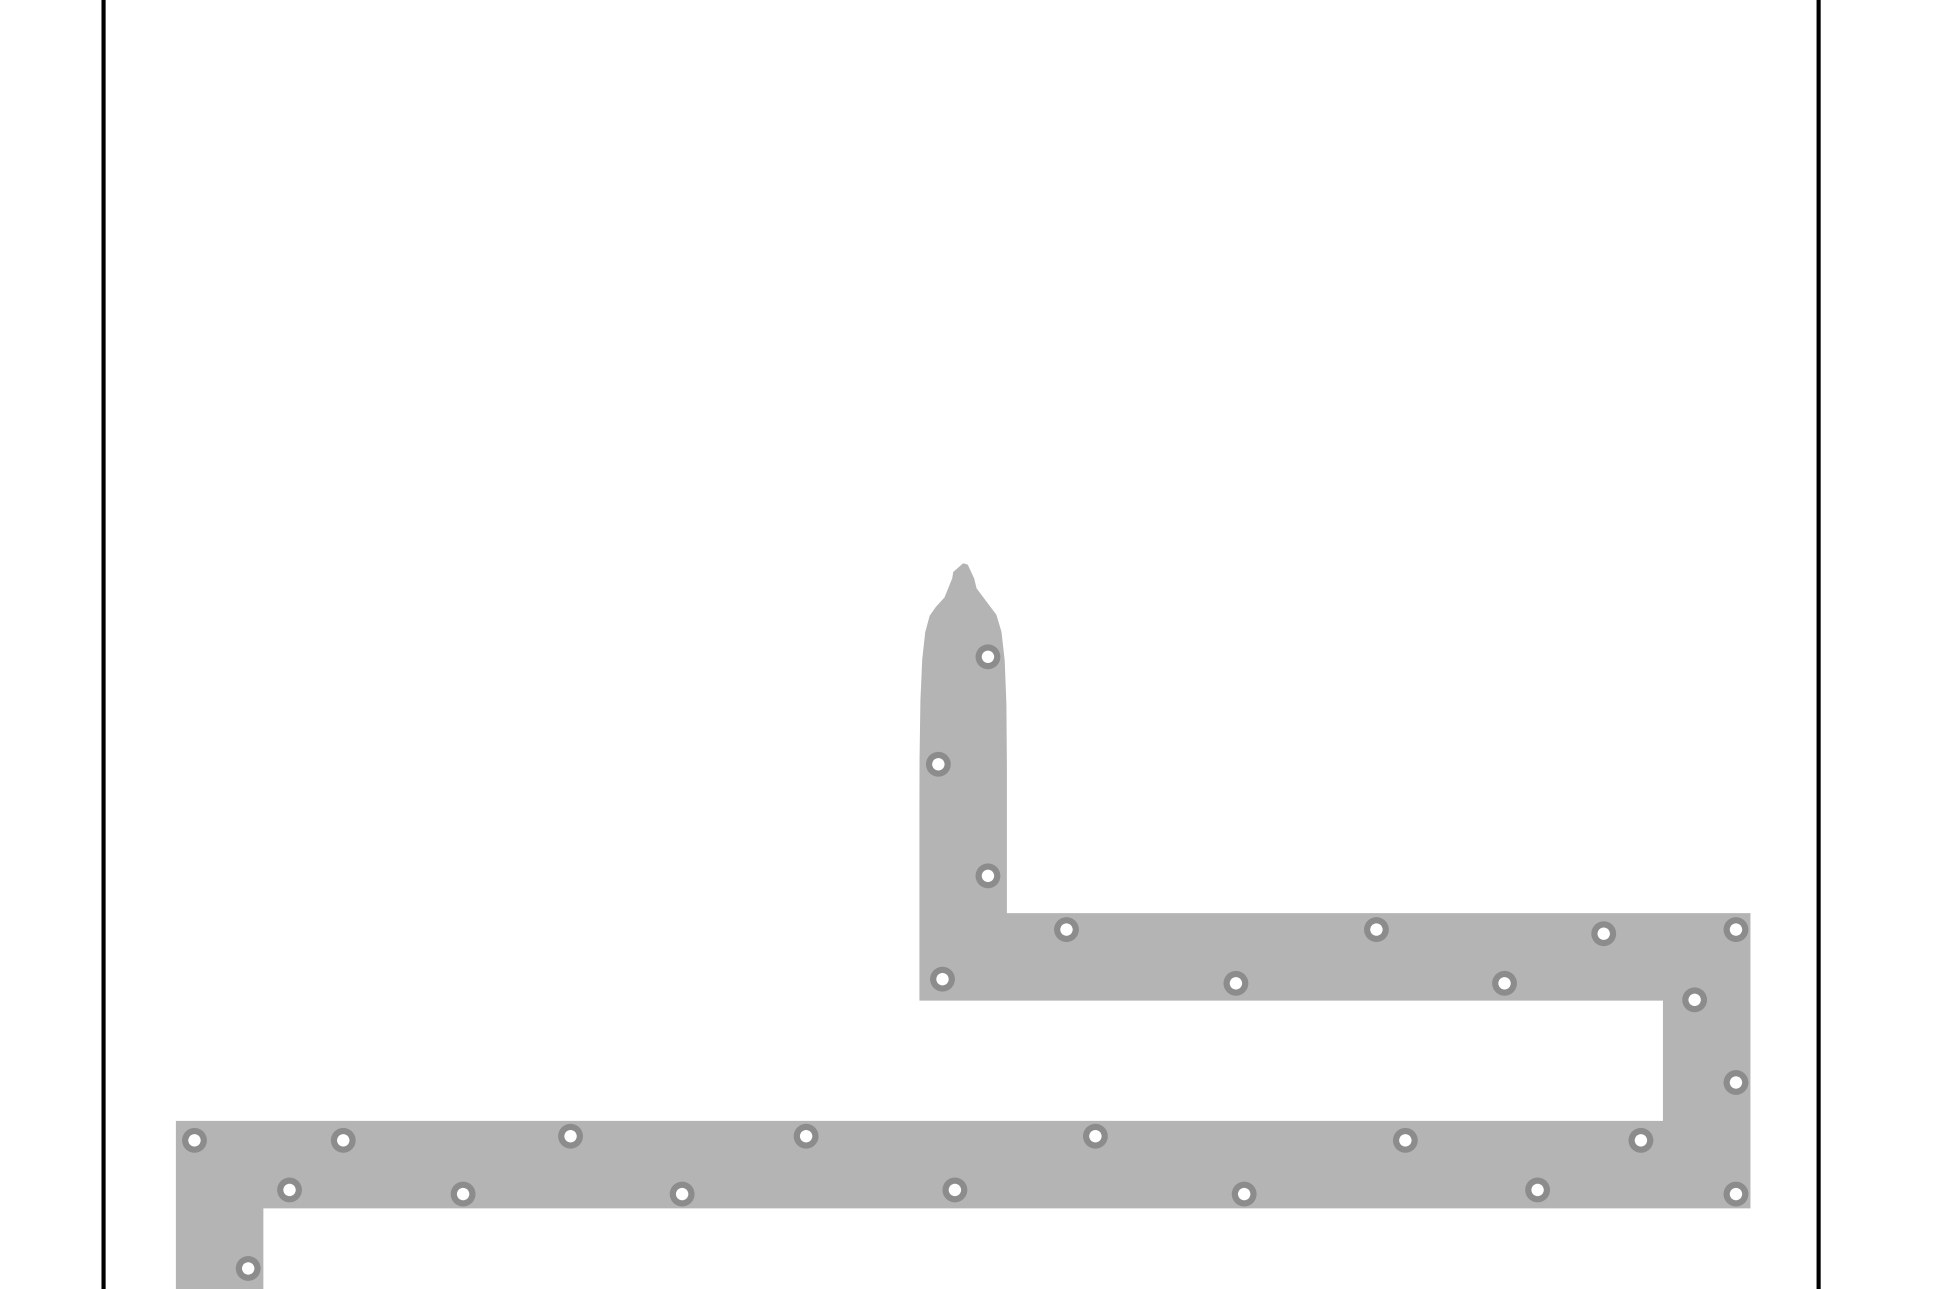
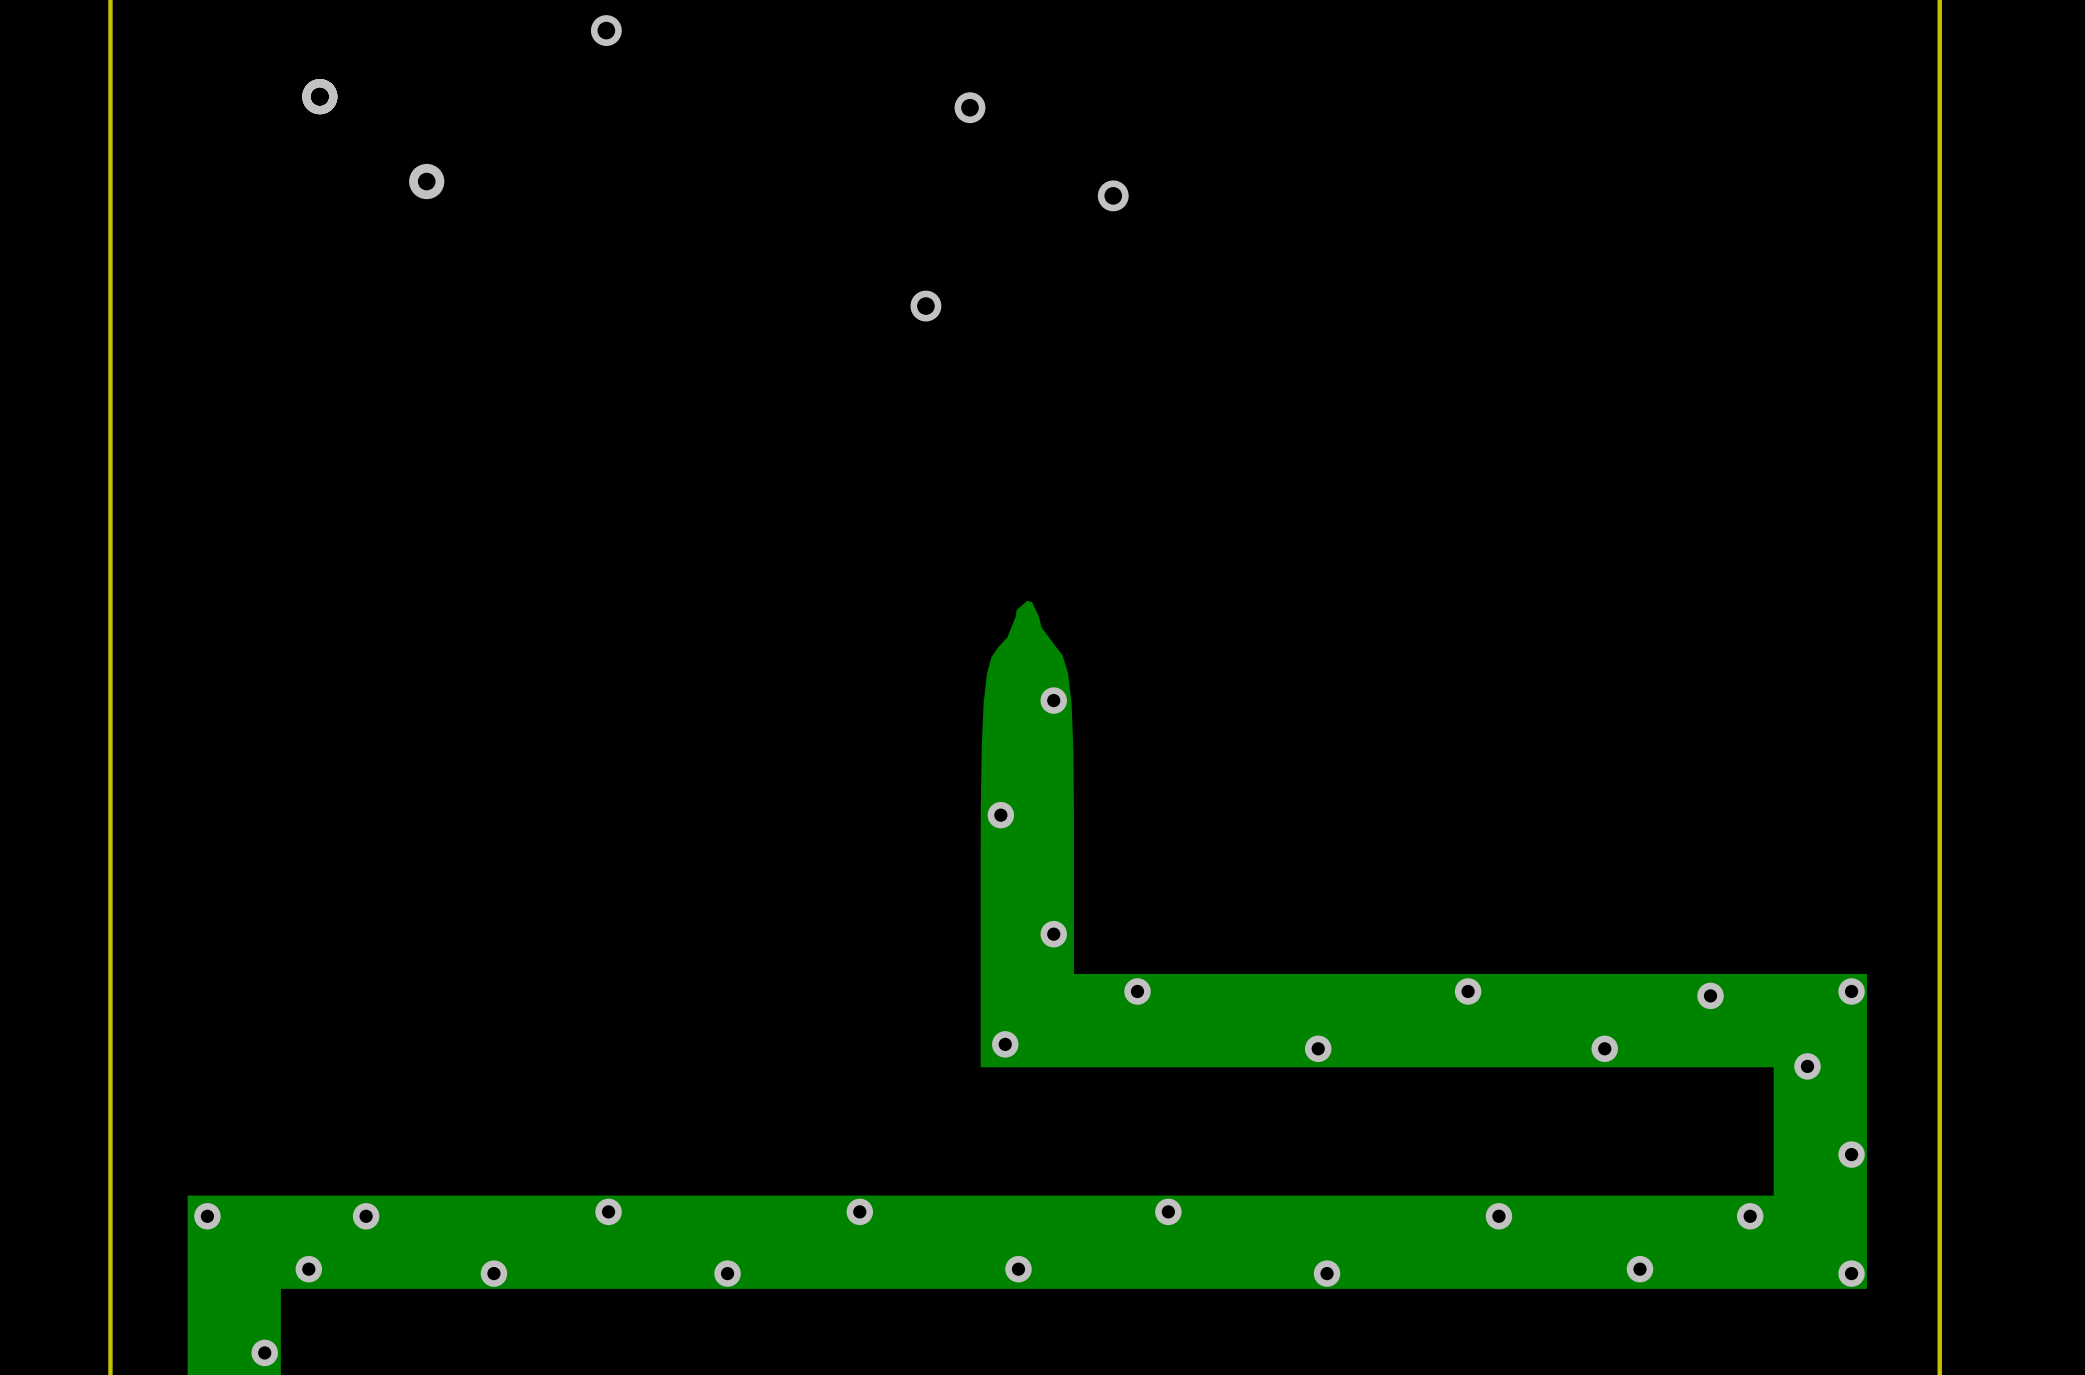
via: none -> (606, 30)
via: none -> (319, 96)
via: none -> (969, 107)
via: none -> (426, 181)
via: none -> (1113, 195)
via: none -> (925, 306)

